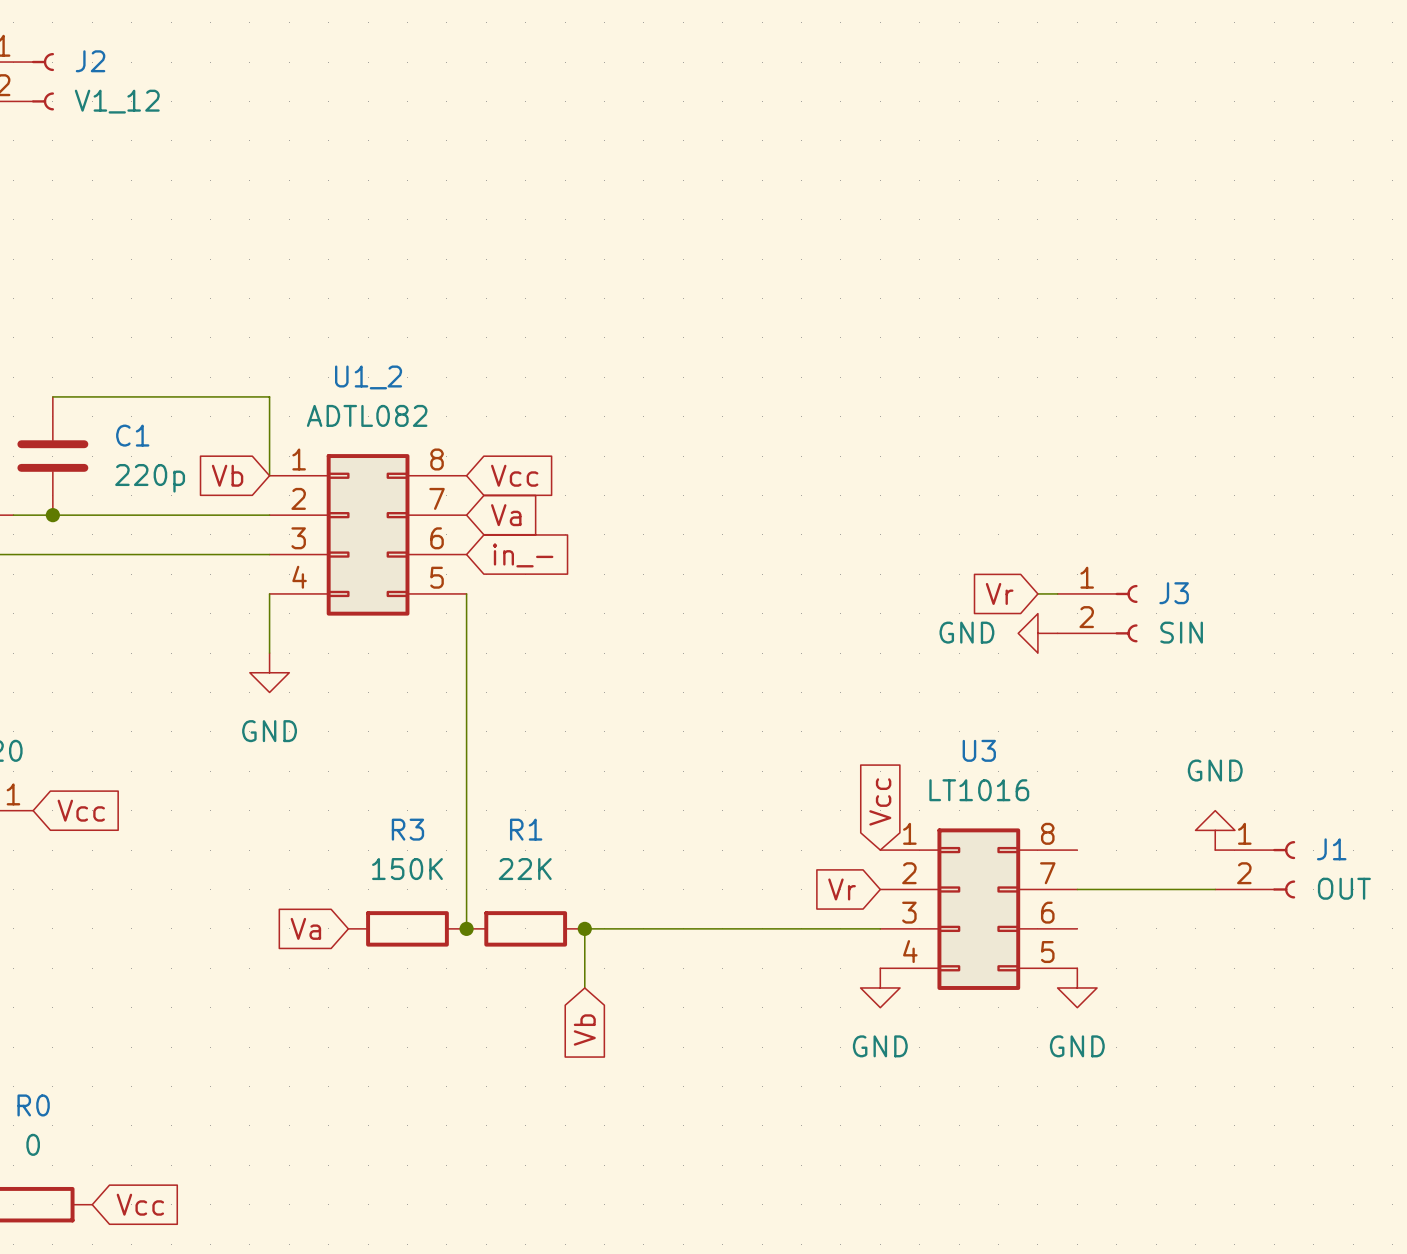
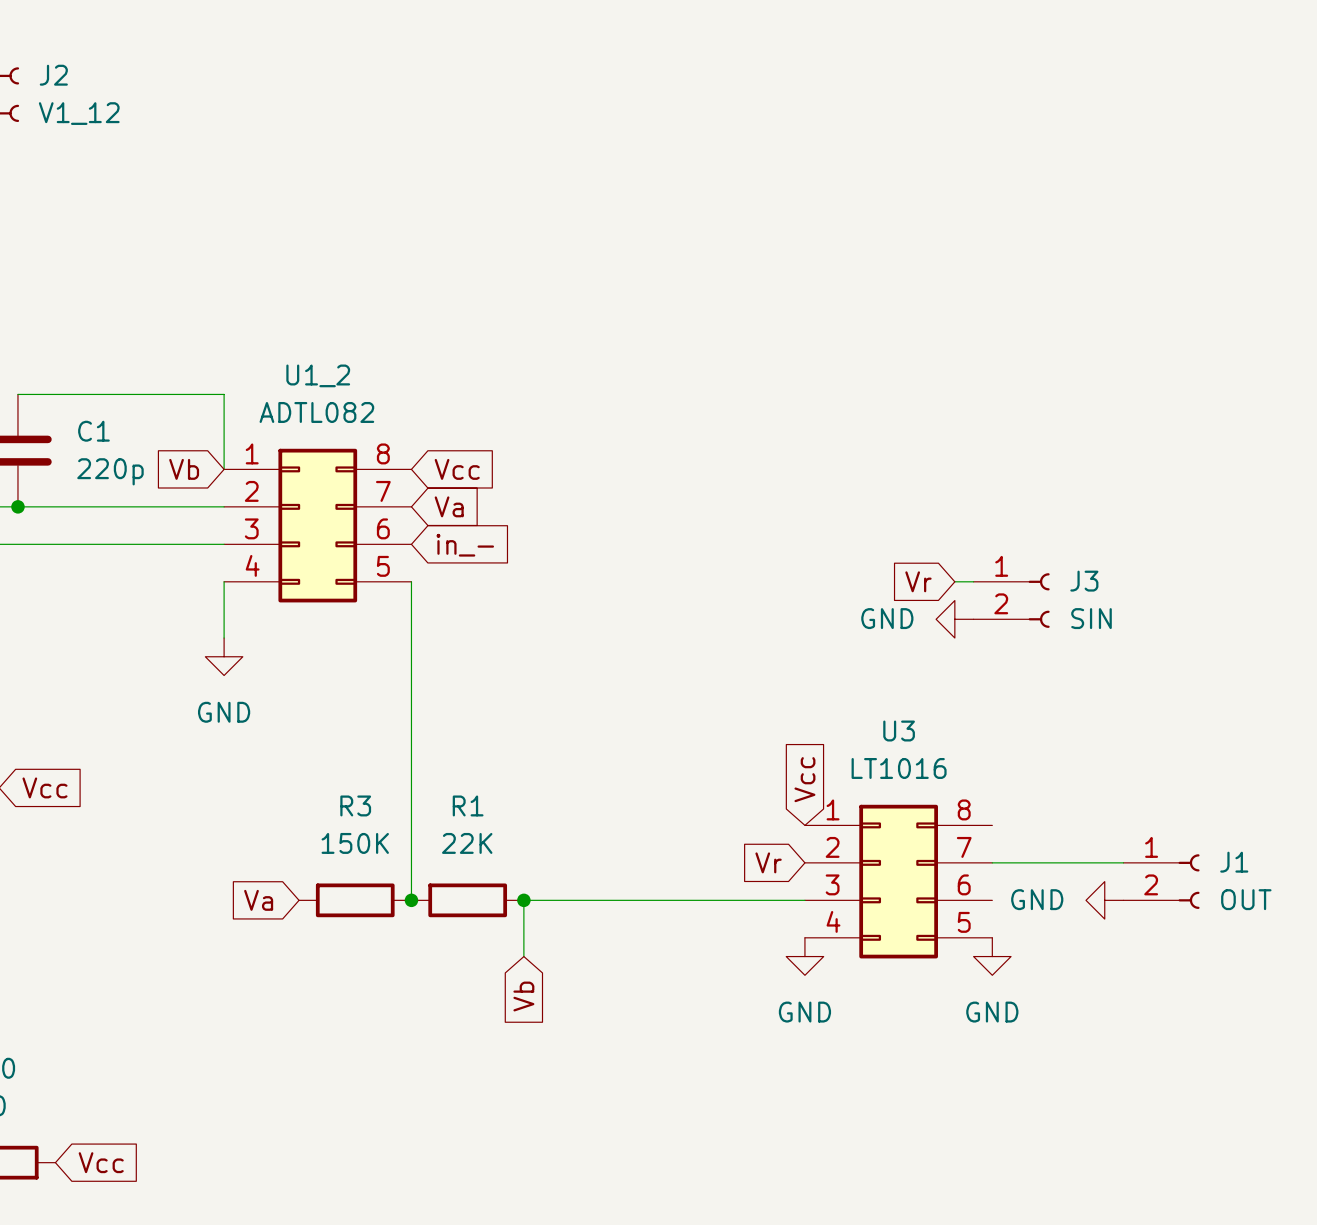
power symbol rotation: 0° (1215, 830) -> 90° counterclockwise (1104, 900)
power symbol position: GND (1215, 830) -> GND (1104, 900)
J1 position: (1255, 869) -> (1161, 881)

